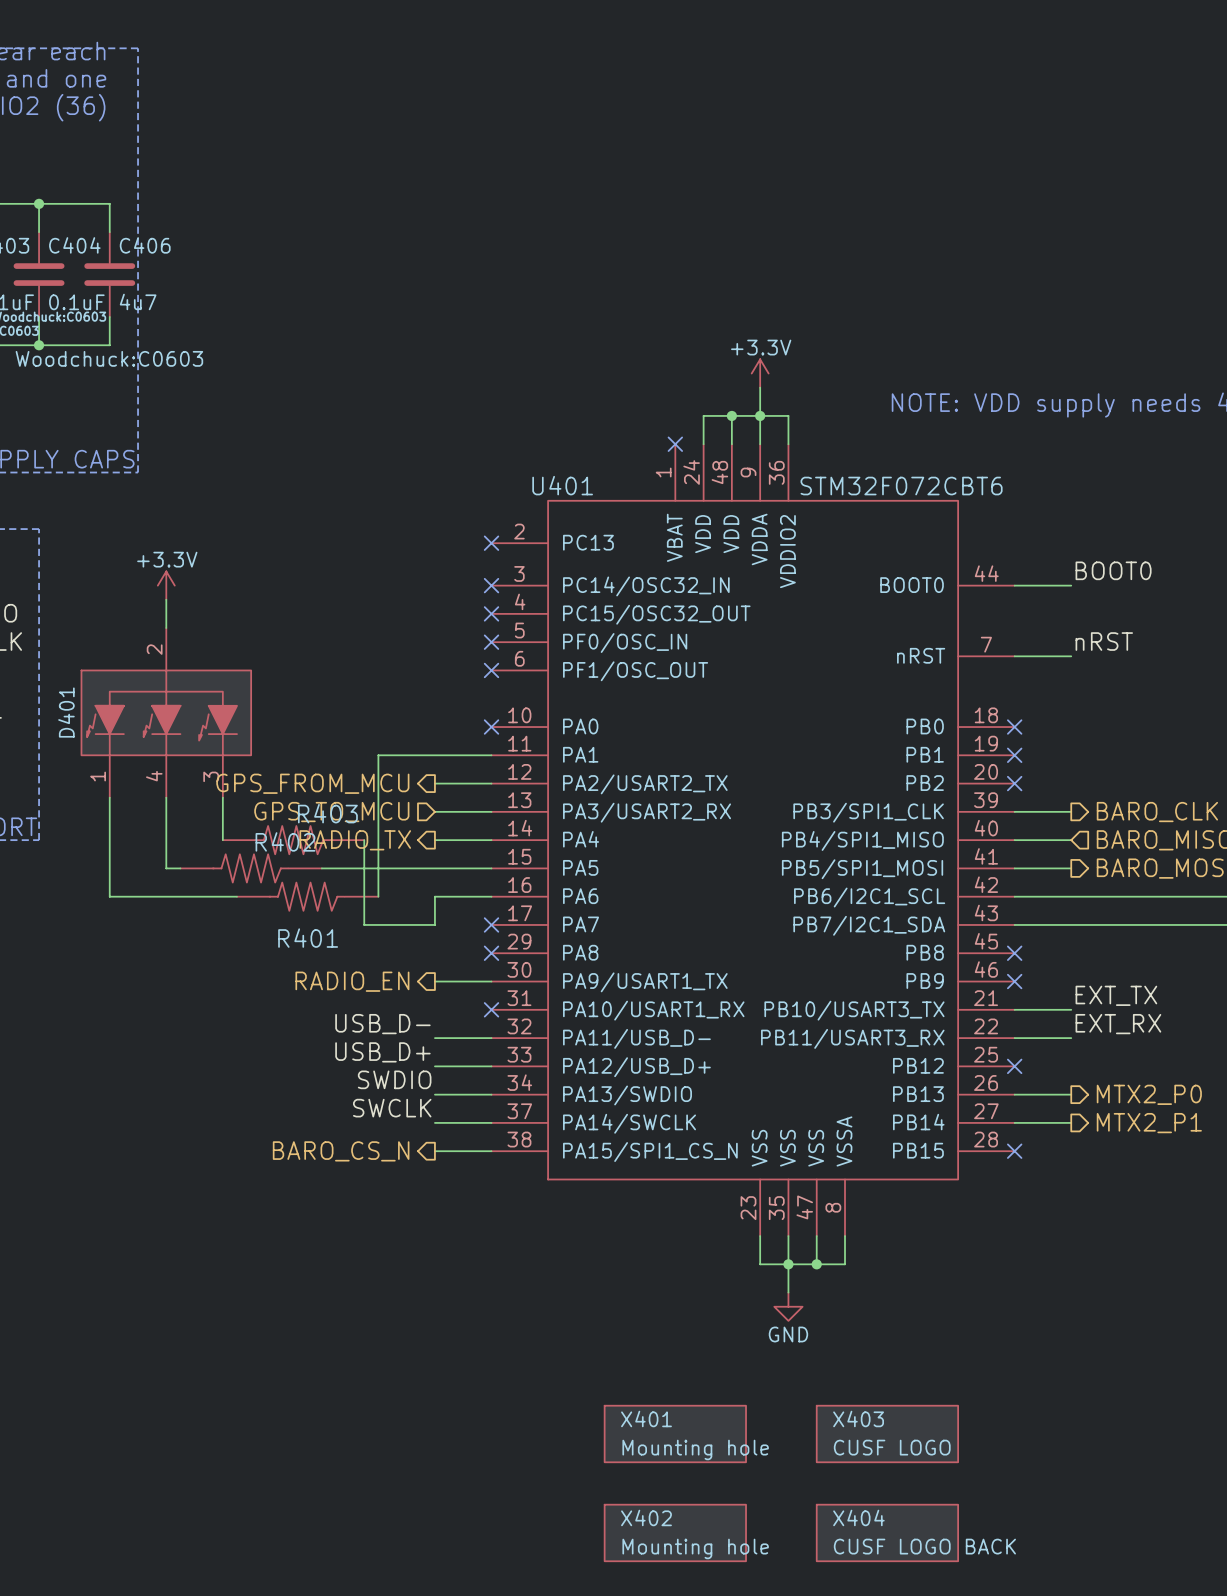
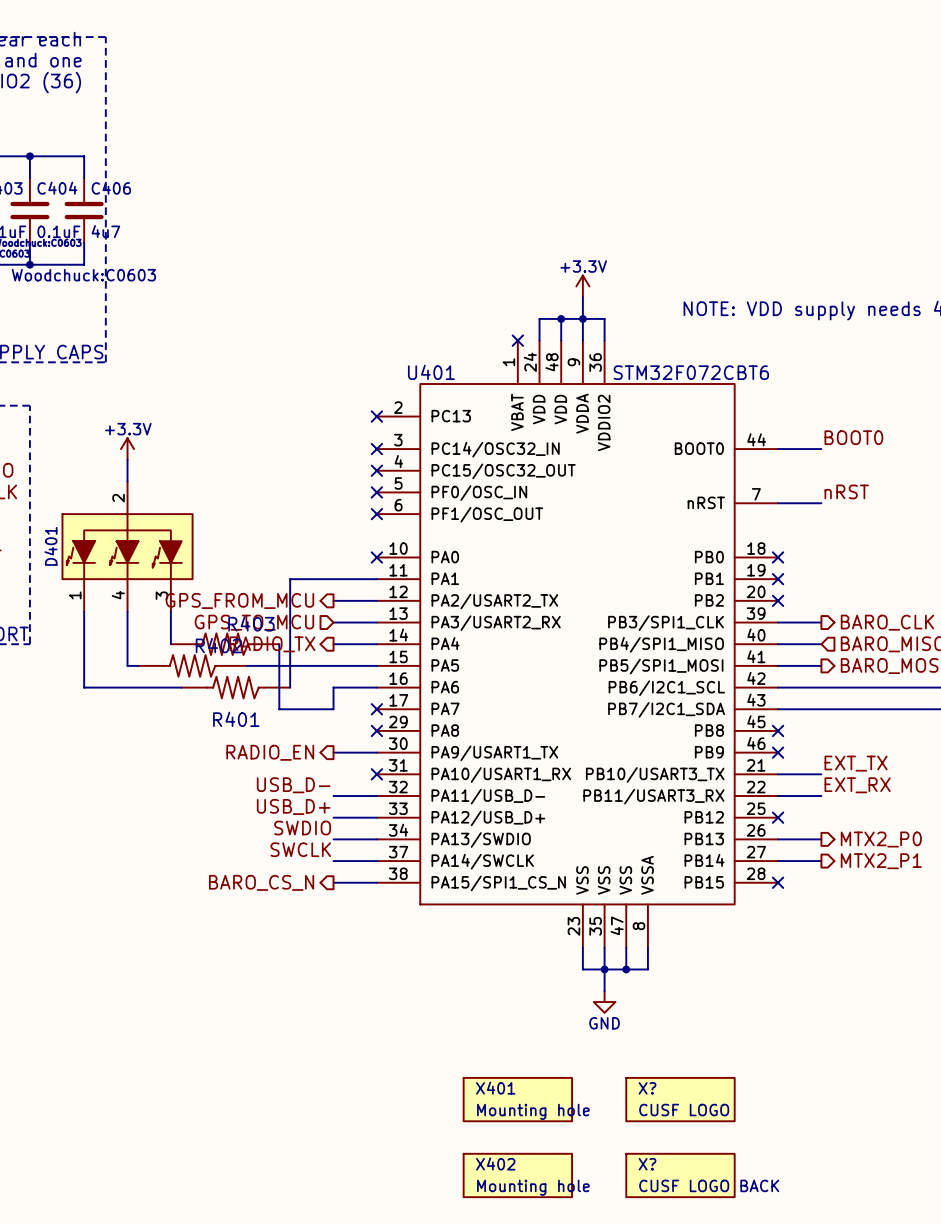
X403 name: X403 (858, 1418) -> X? (647, 1088)
X404 name: X404 (858, 1517) -> X? (647, 1164)

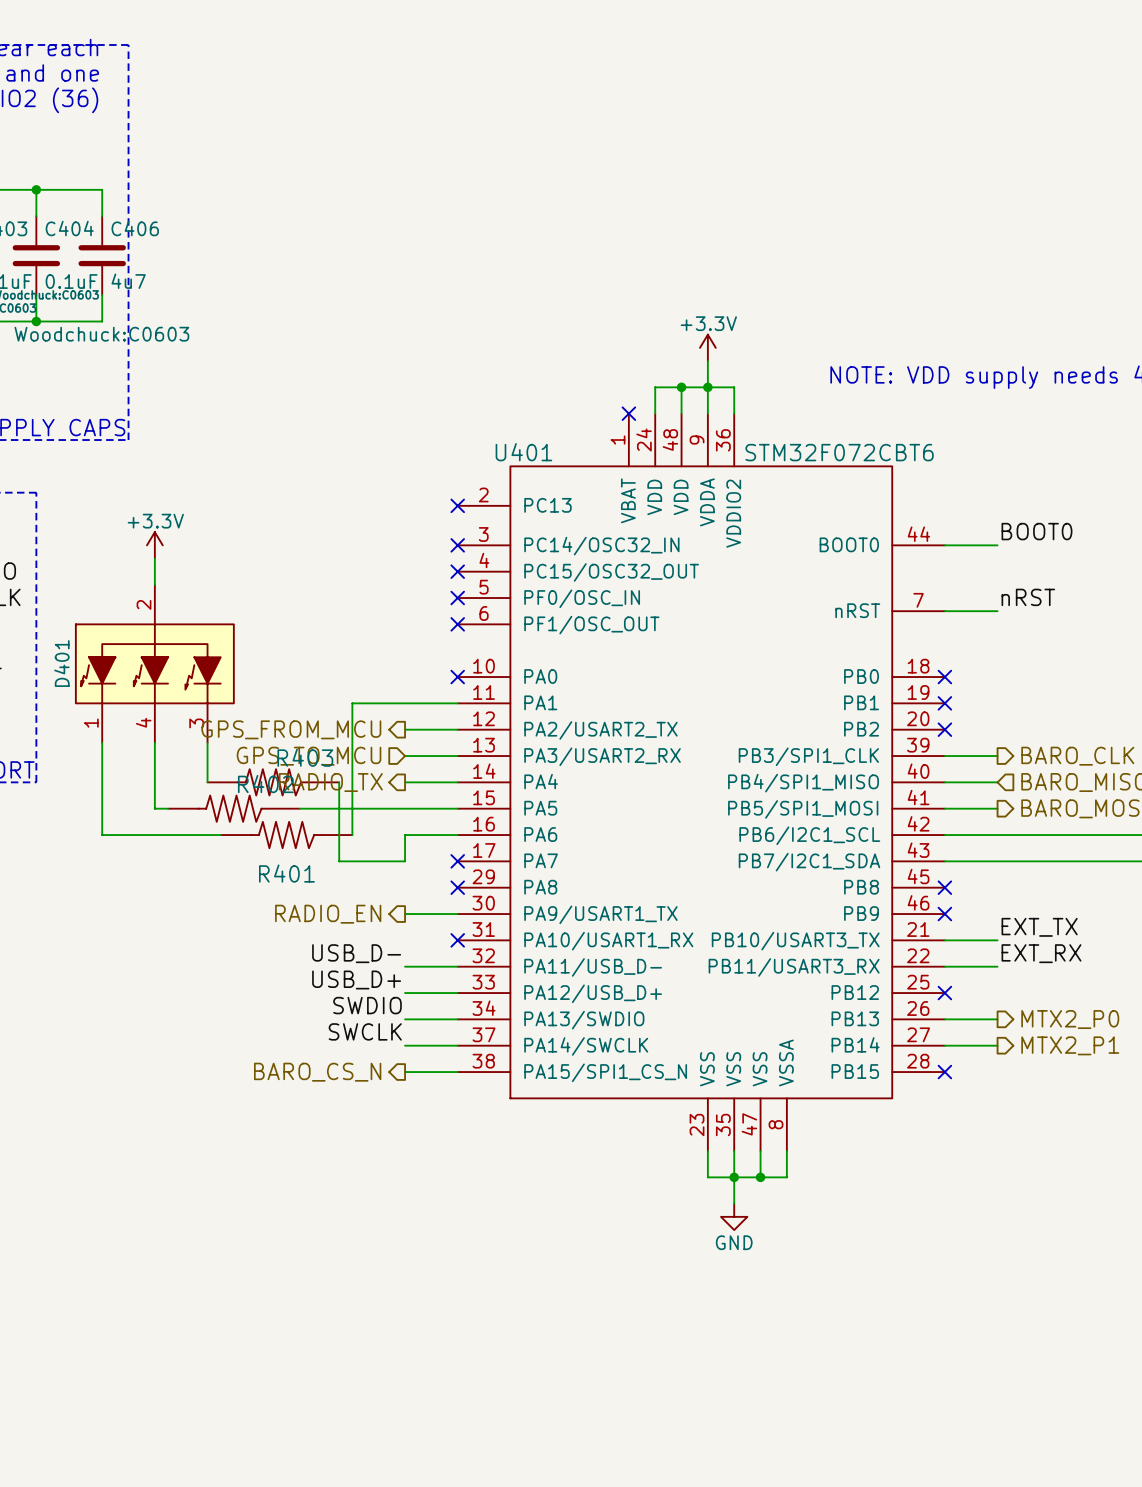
X401: Mounting hole (517, 1099) -> none
X?: CUSF LOGO (680, 1099) -> none
X402: Mounting hole (517, 1175) -> none
X?: CUSF LOGO BACK (680, 1175) -> none

